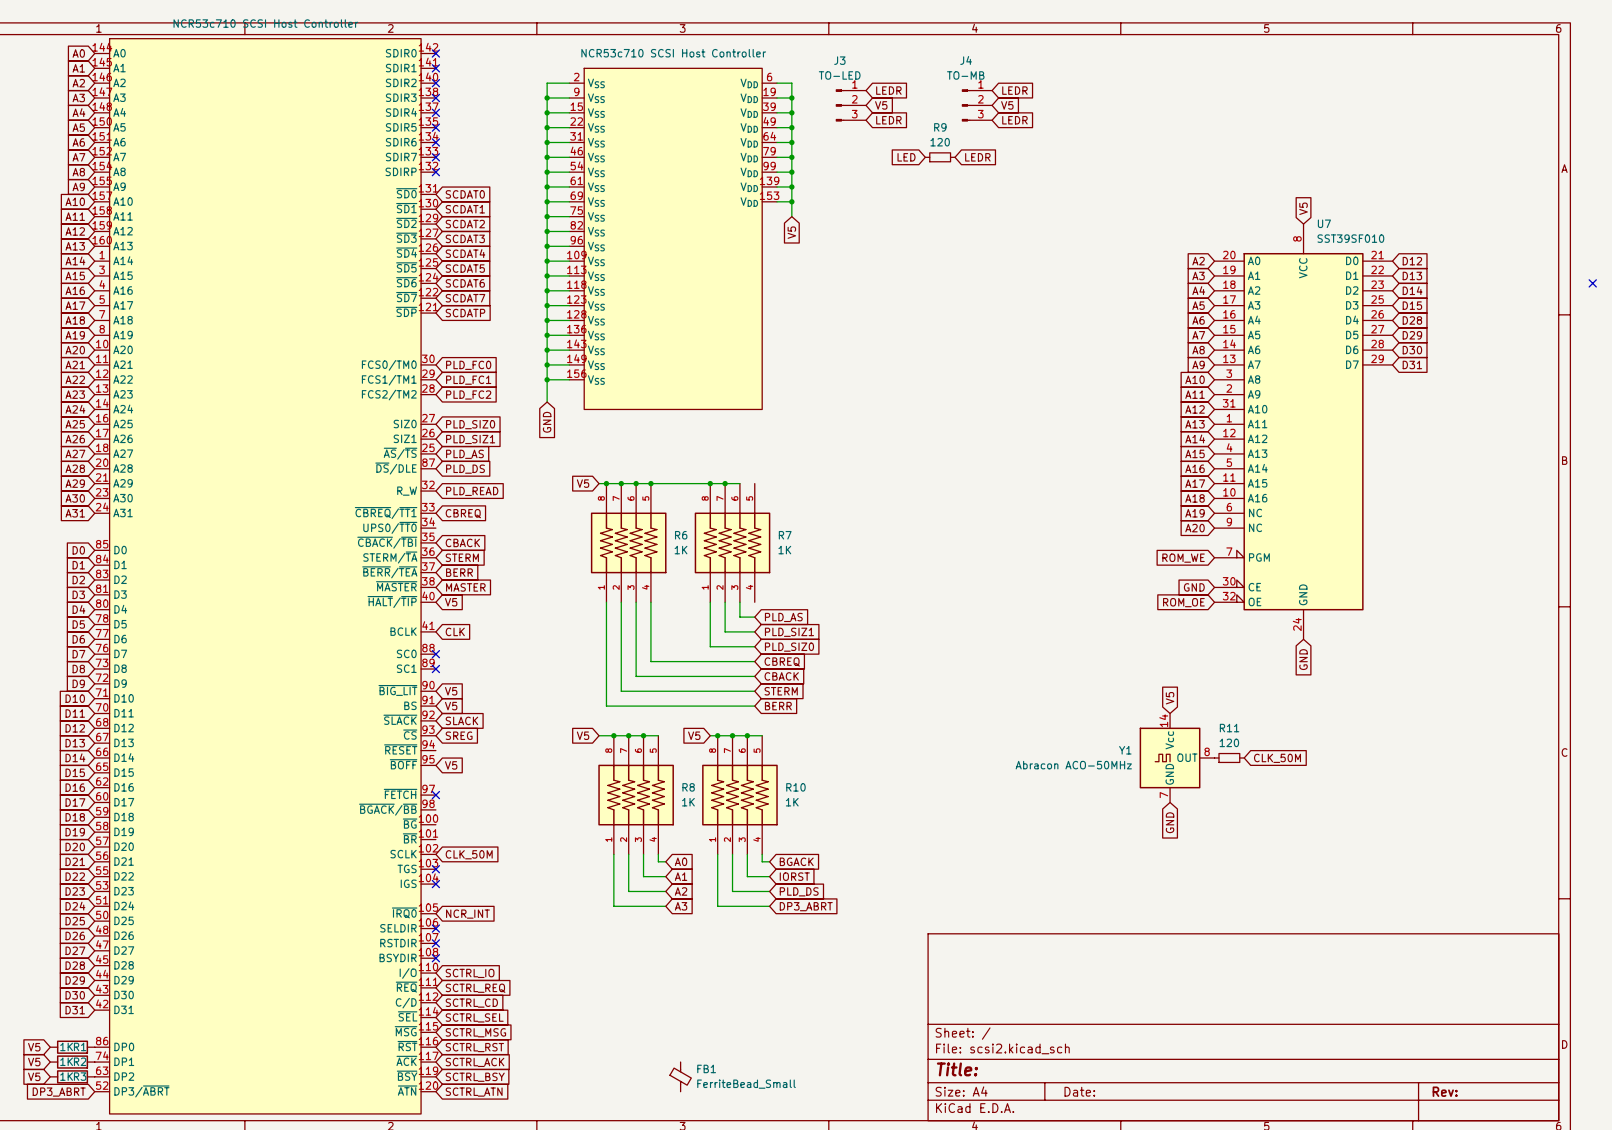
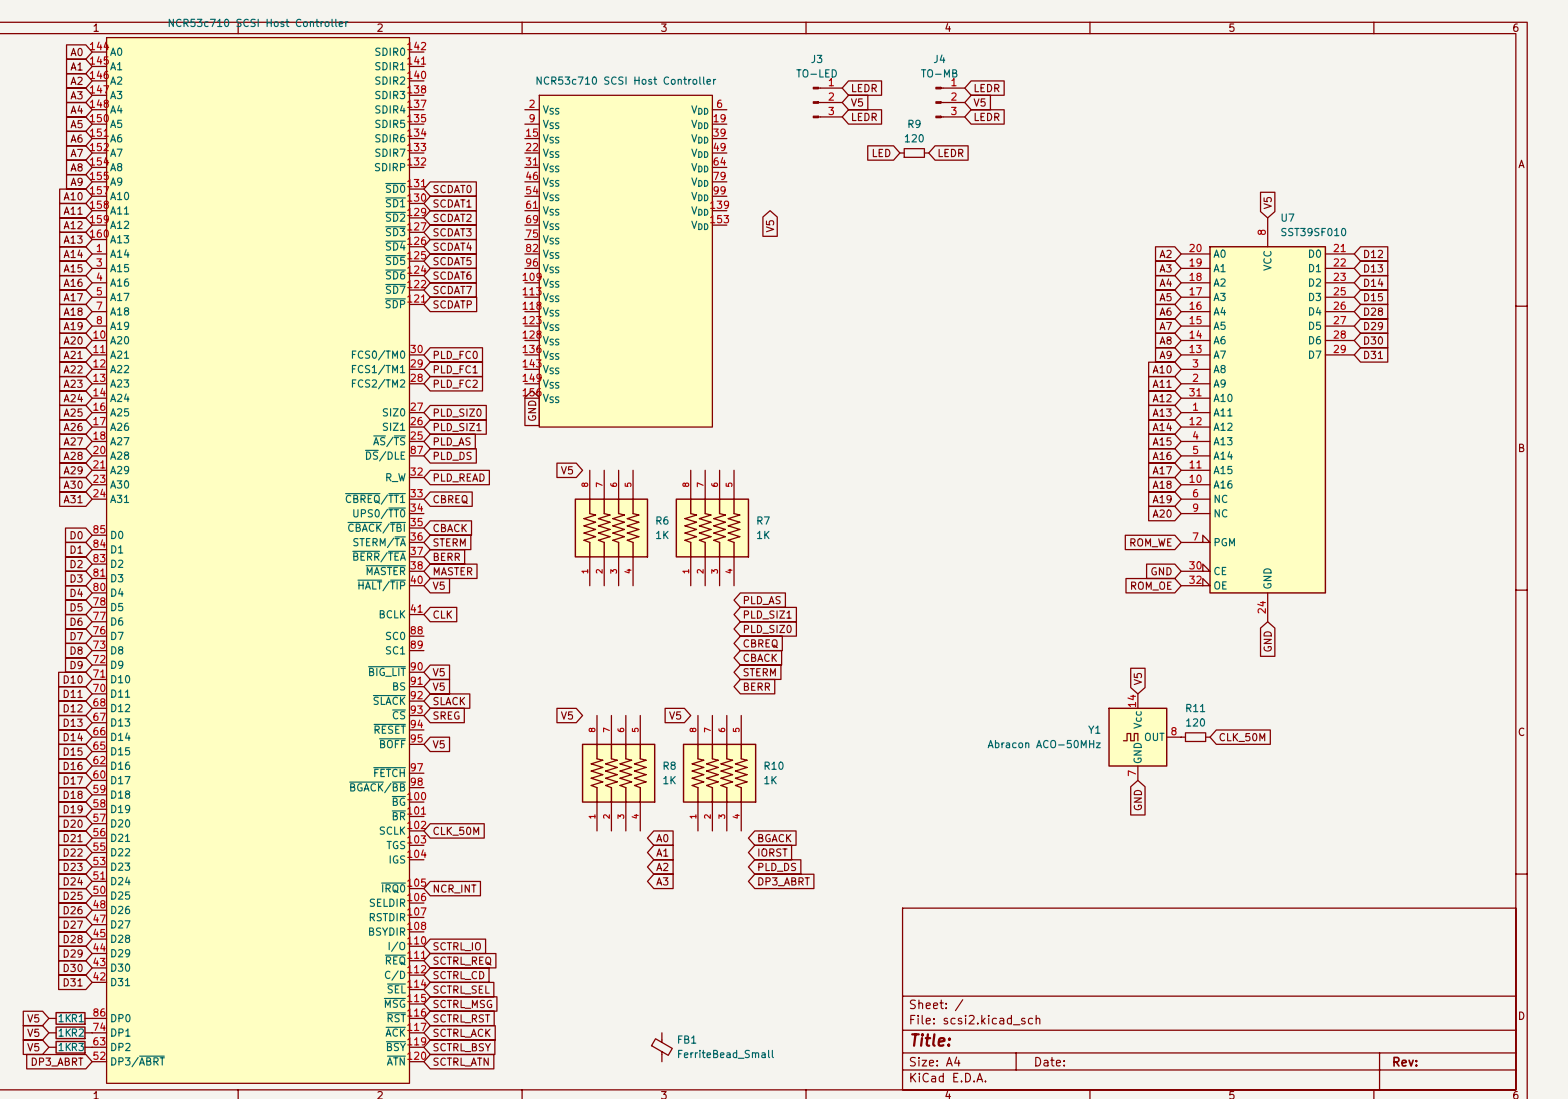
no-connect mark: (435, 53) -> none
no-connect mark: (435, 68) -> none
no-connect mark: (435, 83) -> none
wire: (569, 83) (547, 83) (547, 402) -> none
wire: (777, 83) (791, 83) (791, 216) -> none
no-connect mark: (435, 97) -> none
junction: (547, 97) -> none
wire: (777, 97) (791, 97) -> none
junction: (791, 97) -> none
no-connect mark: (435, 112) -> none
junction: (547, 112) -> none
wire: (777, 112) (791, 112) -> none
junction: (791, 112) -> none
no-connect mark: (435, 127) -> none
junction: (547, 127) -> none
wire: (777, 127) (791, 127) -> none
junction: (791, 127) -> none
no-connect mark: (435, 142) -> none
junction: (547, 142) -> none
wire: (777, 142) (791, 142) -> none
junction: (791, 142) -> none
no-connect mark: (435, 157) -> none
junction: (547, 157) -> none
wire: (777, 157) (791, 157) -> none
junction: (791, 157) -> none
no-connect mark: (435, 172) -> none
junction: (547, 172) -> none
wire: (777, 172) (791, 172) -> none
junction: (791, 172) -> none
junction: (547, 186) -> none
wire: (777, 186) (791, 186) -> none
junction: (791, 186) -> none
junction: (547, 201) -> none
wire: (777, 201) (791, 201) -> none
junction: (791, 201) -> none
junction: (547, 216) -> none
junction: (547, 231) -> none
part position: (673, 238) -> (625, 261)
junction: (547, 246) -> none
junction: (547, 261) -> none
junction: (547, 275) -> none
no-connect mark: (1592, 283) -> none
junction: (547, 290) -> none
junction: (547, 305) -> none
junction: (547, 320) -> none
junction: (547, 335) -> none
junction: (547, 350) -> none
junction: (547, 364) -> none
junction: (547, 379) -> none
wire: (599, 483) (739, 483) -> none
junction: (606, 483) -> none
junction: (621, 483) -> none
junction: (636, 483) -> none
junction: (650, 483) -> none
junction: (710, 483) -> none
junction: (725, 483) -> none
wire: (606, 602) (606, 706) (754, 706) -> none
wire: (621, 602) (621, 691) (754, 691) -> none
wire: (636, 602) (636, 676) (754, 676) -> none
wire: (650, 602) (650, 661) (754, 661) -> none
wire: (710, 602) (710, 646) (754, 646) -> none
wire: (725, 602) (725, 631) (754, 631) -> none
wire: (739, 602) (739, 617) (754, 617) -> none
no-connect mark: (435, 654) -> none
no-connect mark: (435, 669) -> none
wire: (599, 735) (658, 735) -> none
junction: (613, 735) -> none
junction: (628, 735) -> none
junction: (643, 735) -> none
wire: (710, 735) (762, 735) -> none
junction: (717, 735) -> none
junction: (732, 735) -> none
junction: (747, 735) -> none
no-connect mark: (435, 795) -> none
wire: (613, 854) (613, 906) (665, 906) -> none
wire: (628, 854) (628, 891) (665, 891) -> none
wire: (643, 854) (643, 876) (665, 876) -> none
wire: (658, 854) (658, 861) (665, 861) -> none
wire: (717, 854) (717, 906) (769, 906) -> none
wire: (732, 854) (732, 891) (769, 891) -> none
wire: (747, 854) (747, 876) (769, 876) -> none
wire: (762, 854) (762, 861) (769, 861) -> none
no-connect mark: (435, 869) -> none
no-connect mark: (435, 884) -> none
no-connect mark: (435, 928) -> none
no-connect mark: (435, 943) -> none
no-connect mark: (435, 958) -> none

